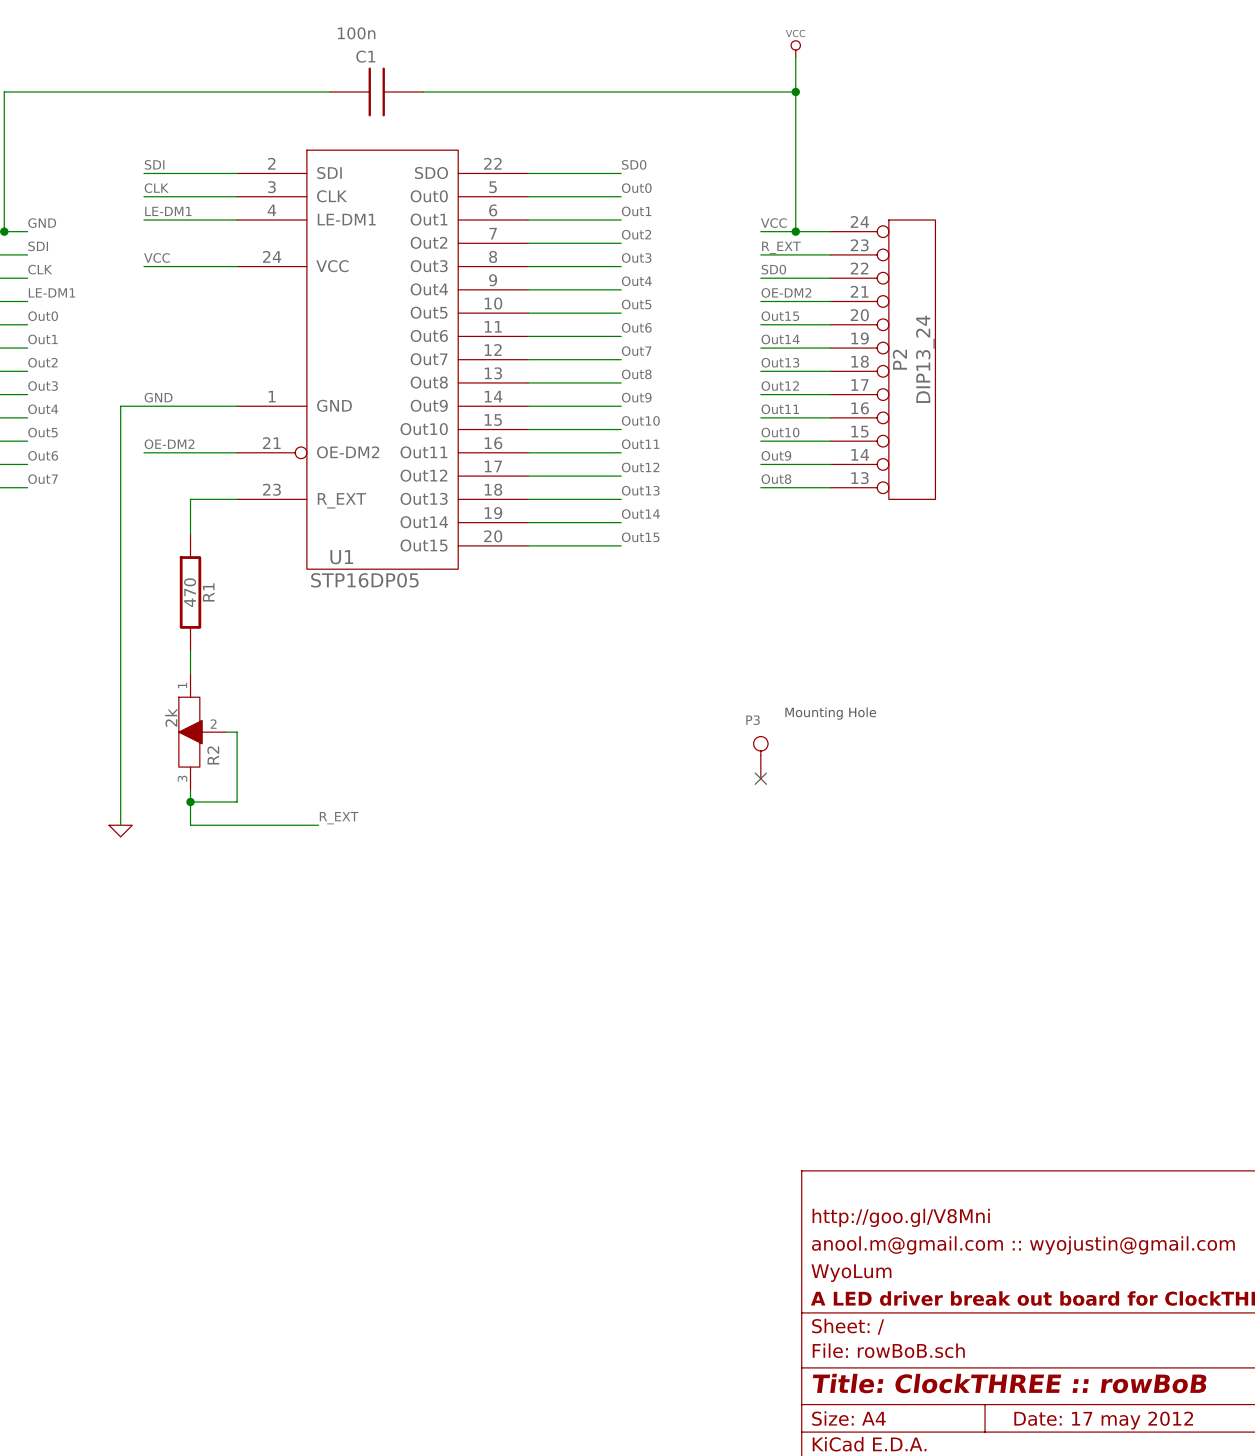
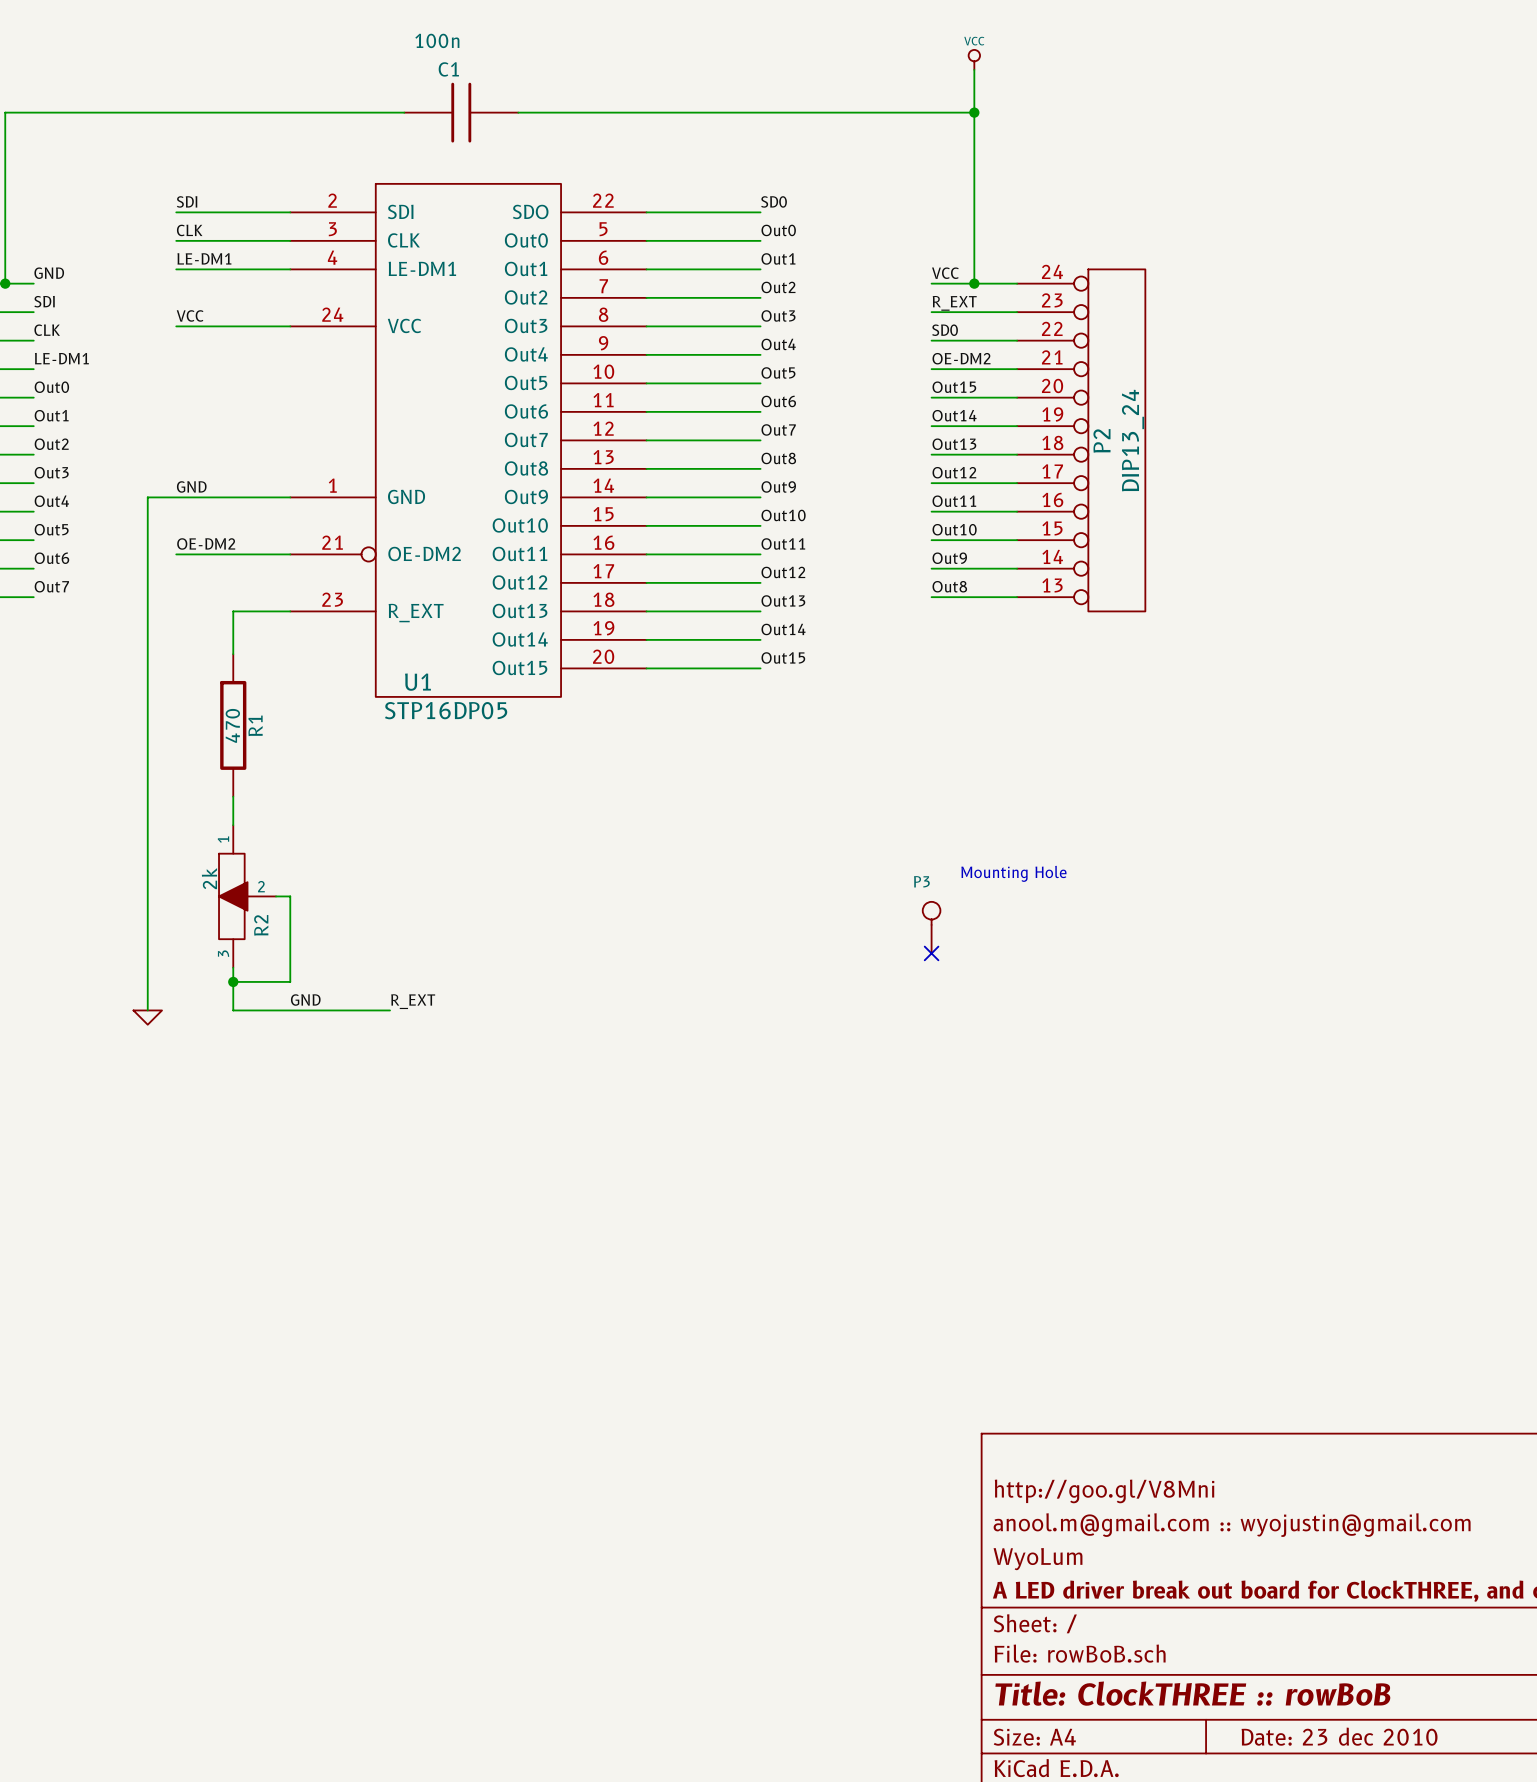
label: none -> GND (305, 1000)
title block: Date: 17 may 2012 (1103, 1420) -> Date: 23 dec 2010 (1339, 1736)

